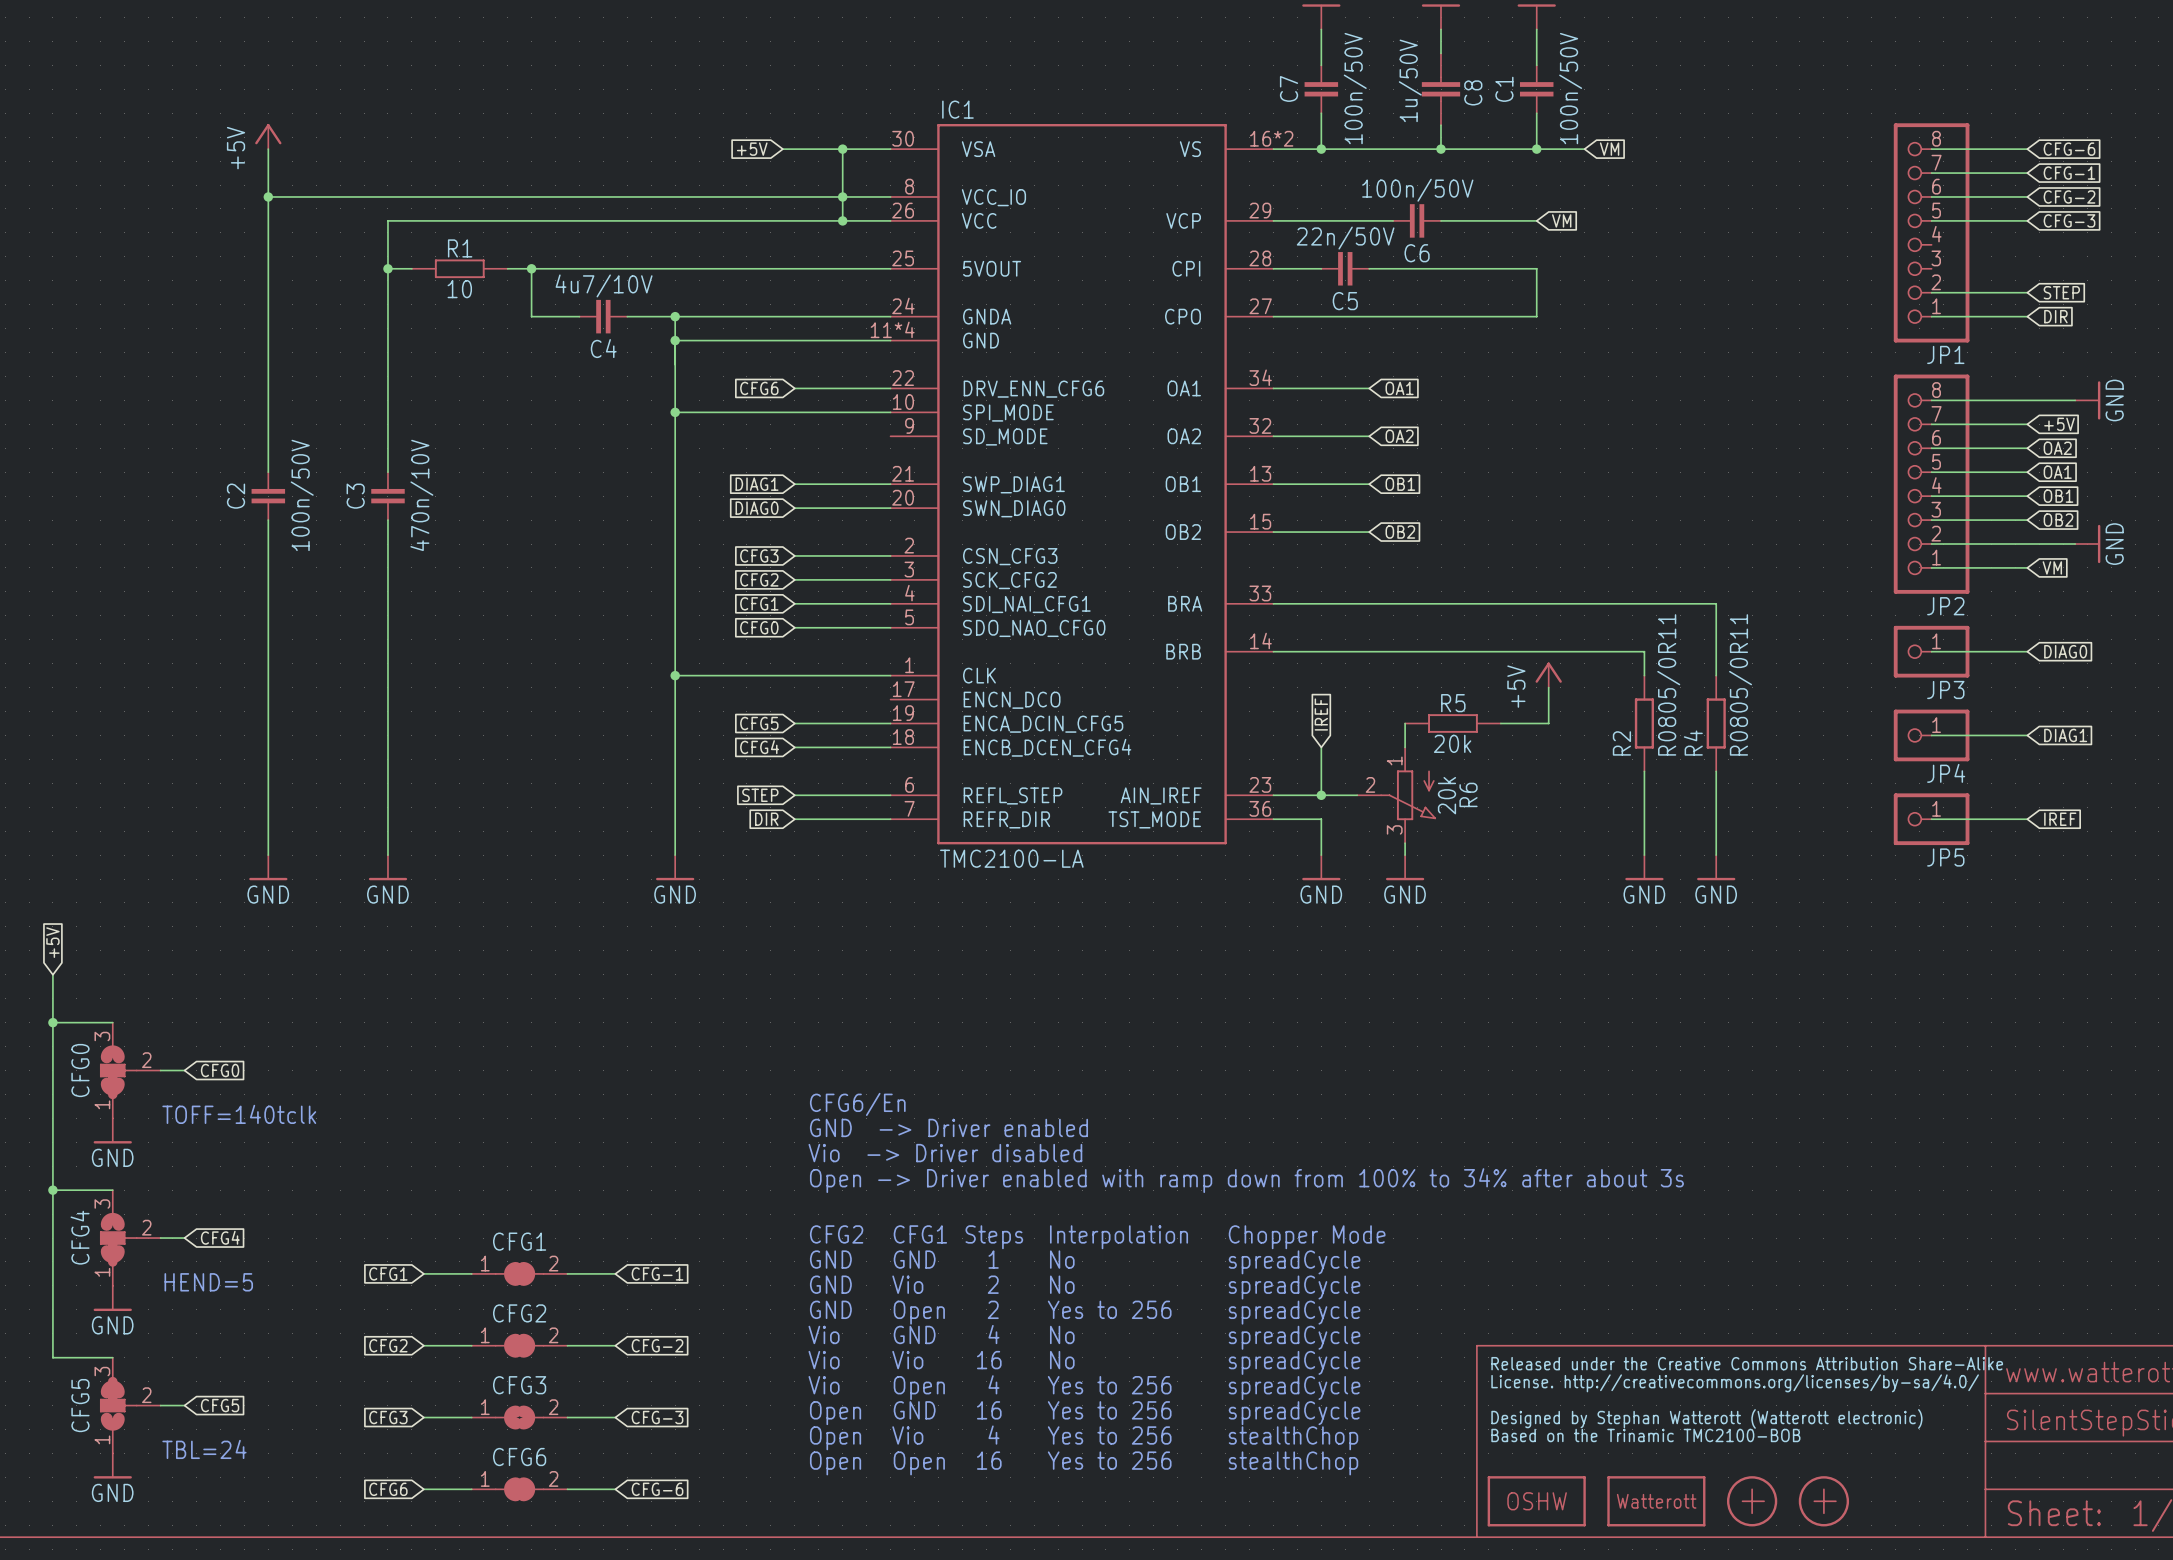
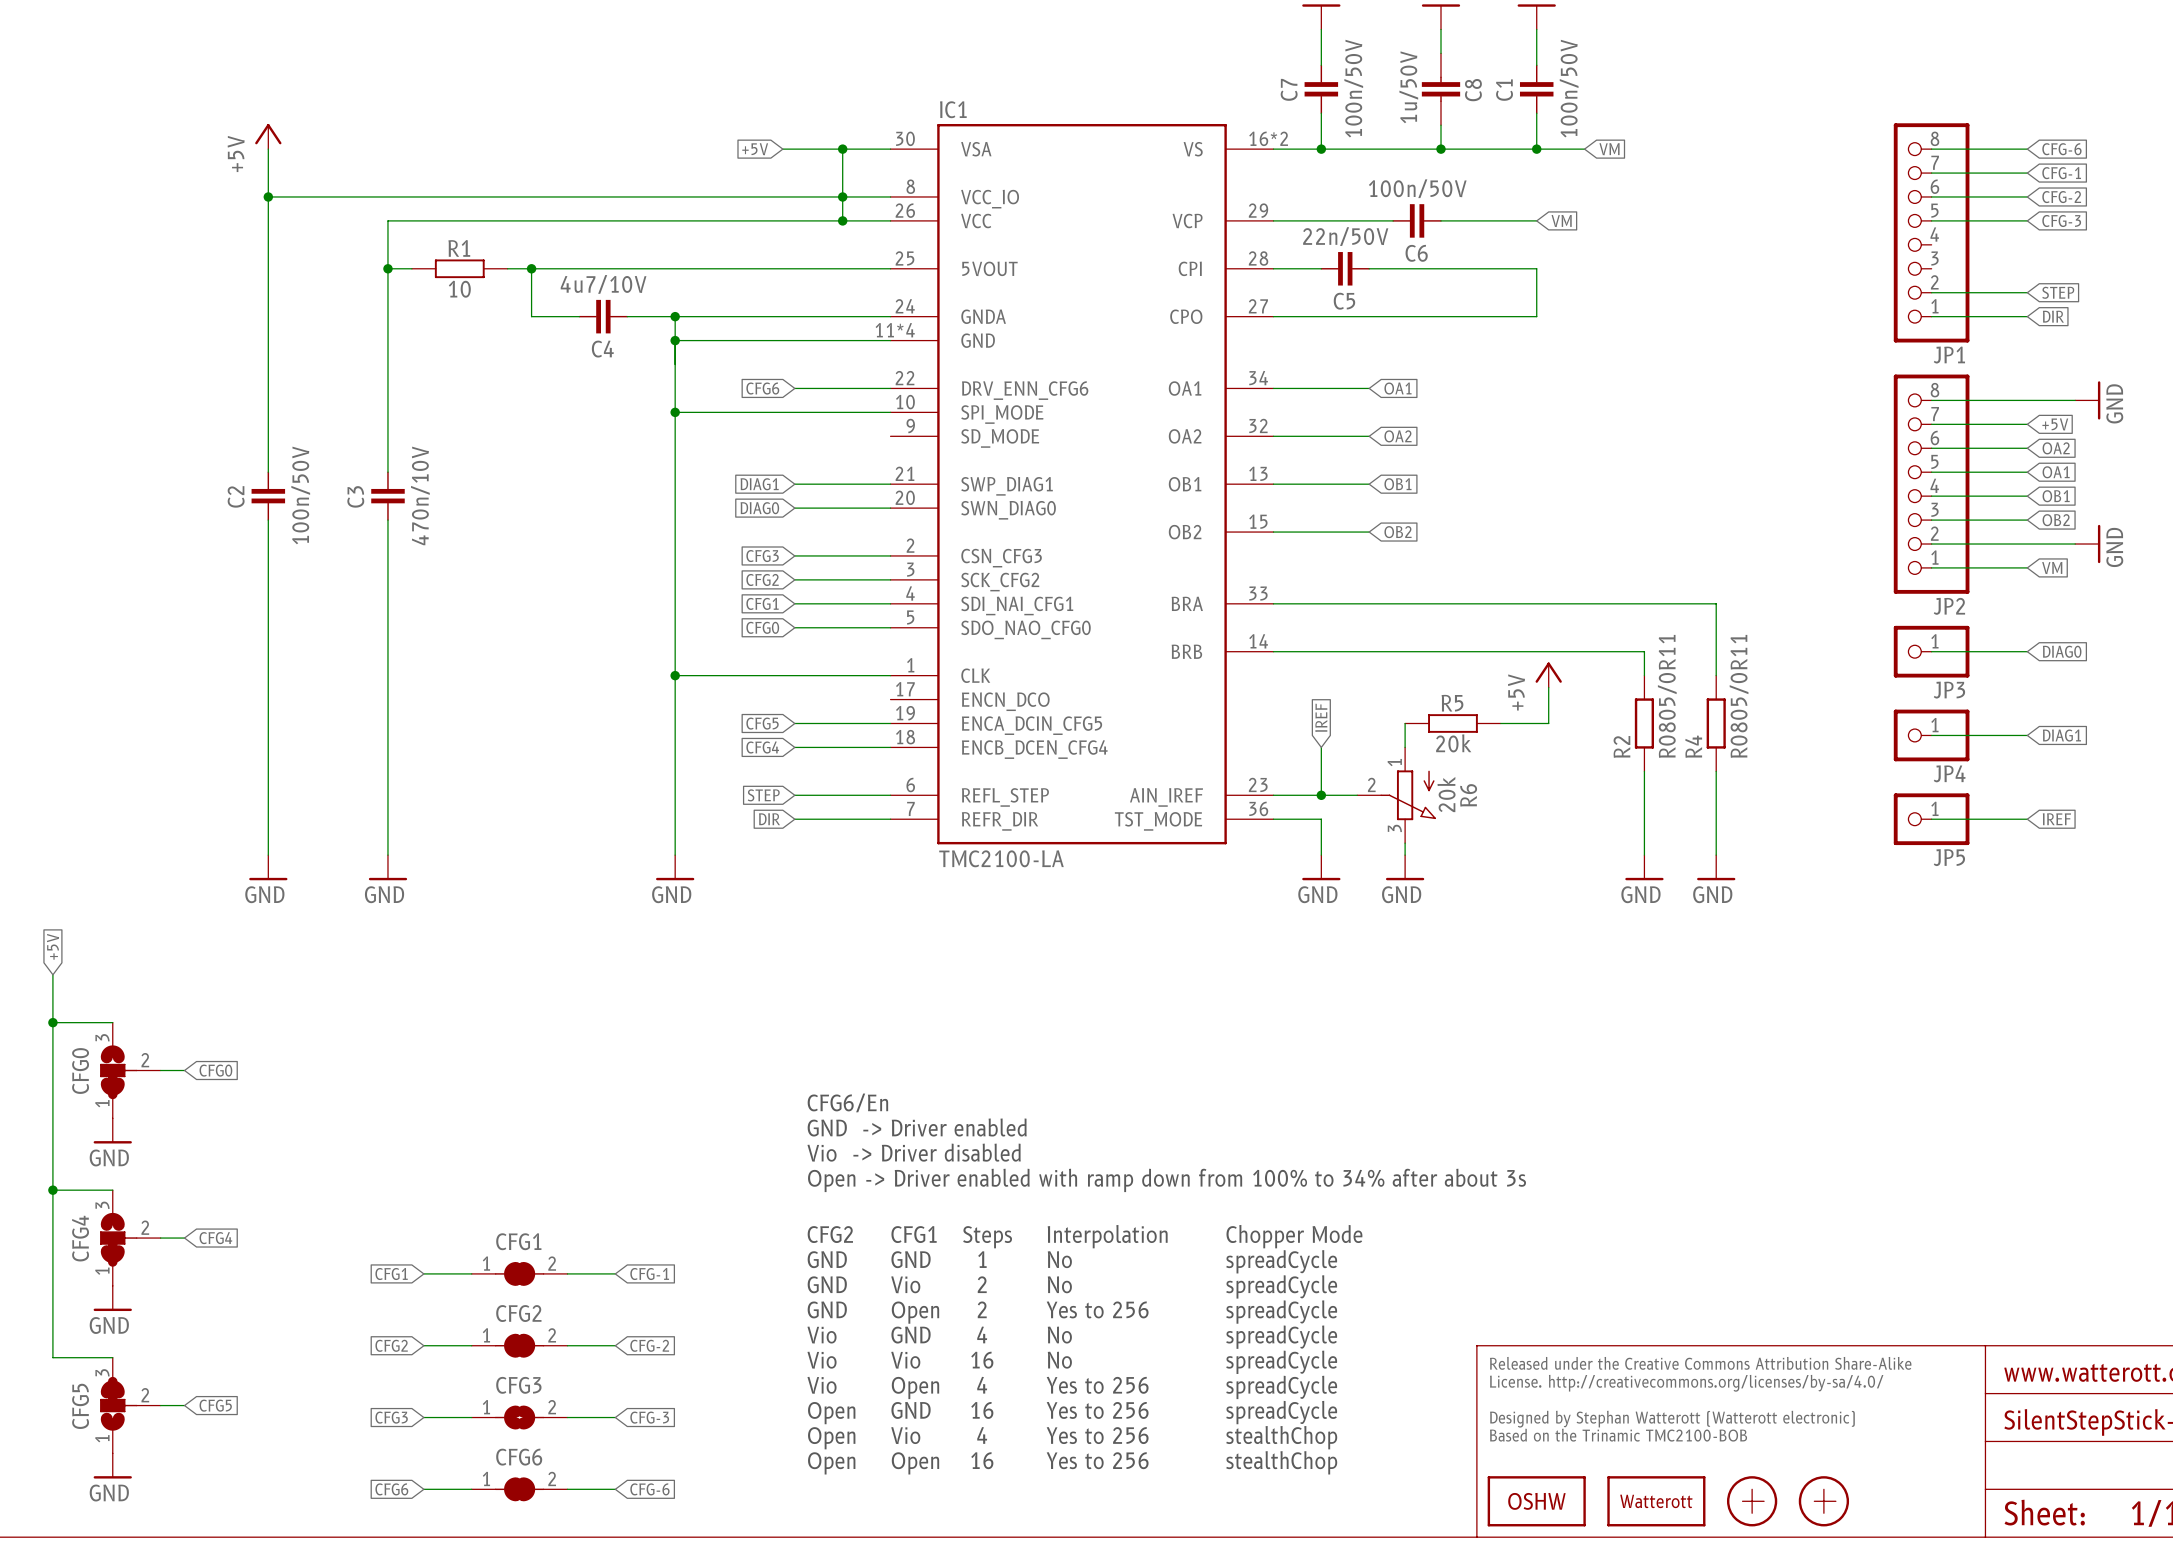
text: TOFF=140tclk (239, 1114) -> none
text: HEND=5 (208, 1282) -> none
text: TBL=24 (204, 1449) -> none

